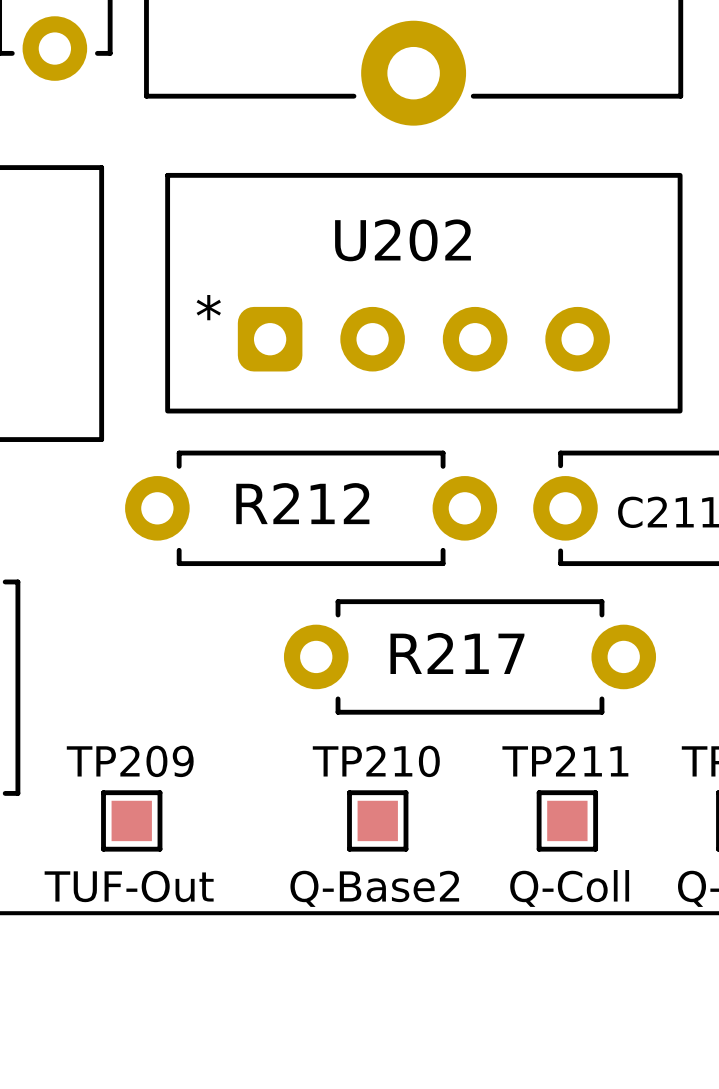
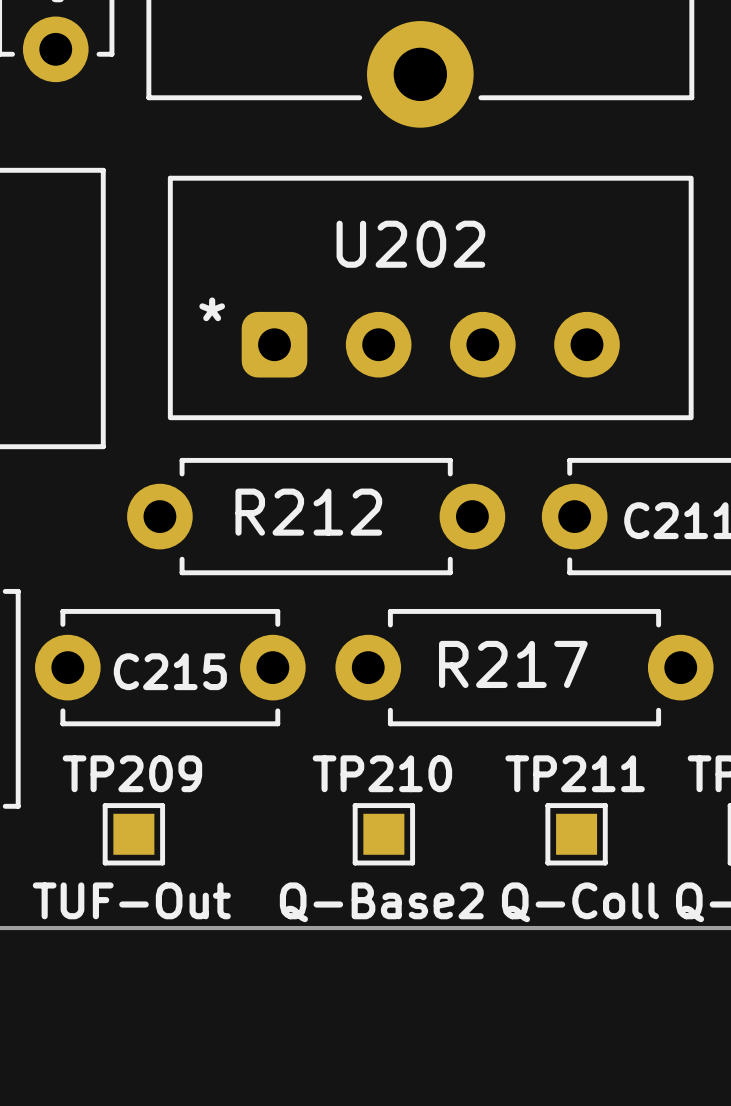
C215: none -> (170, 667)
R217 position: (469, 656) -> (524, 667)

